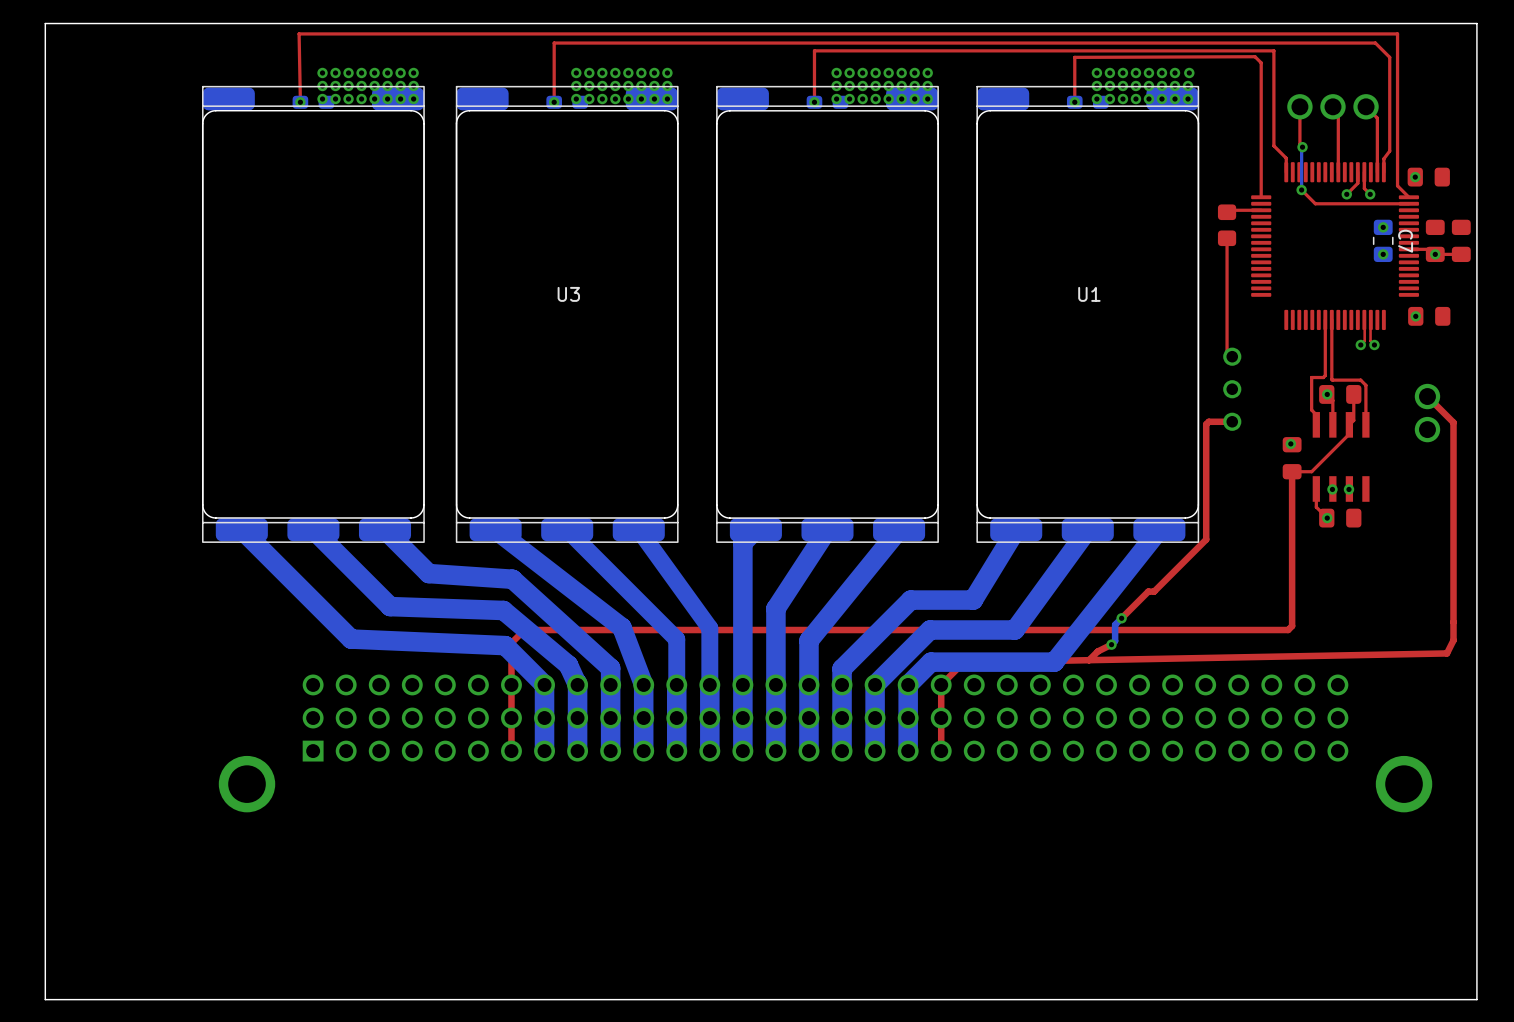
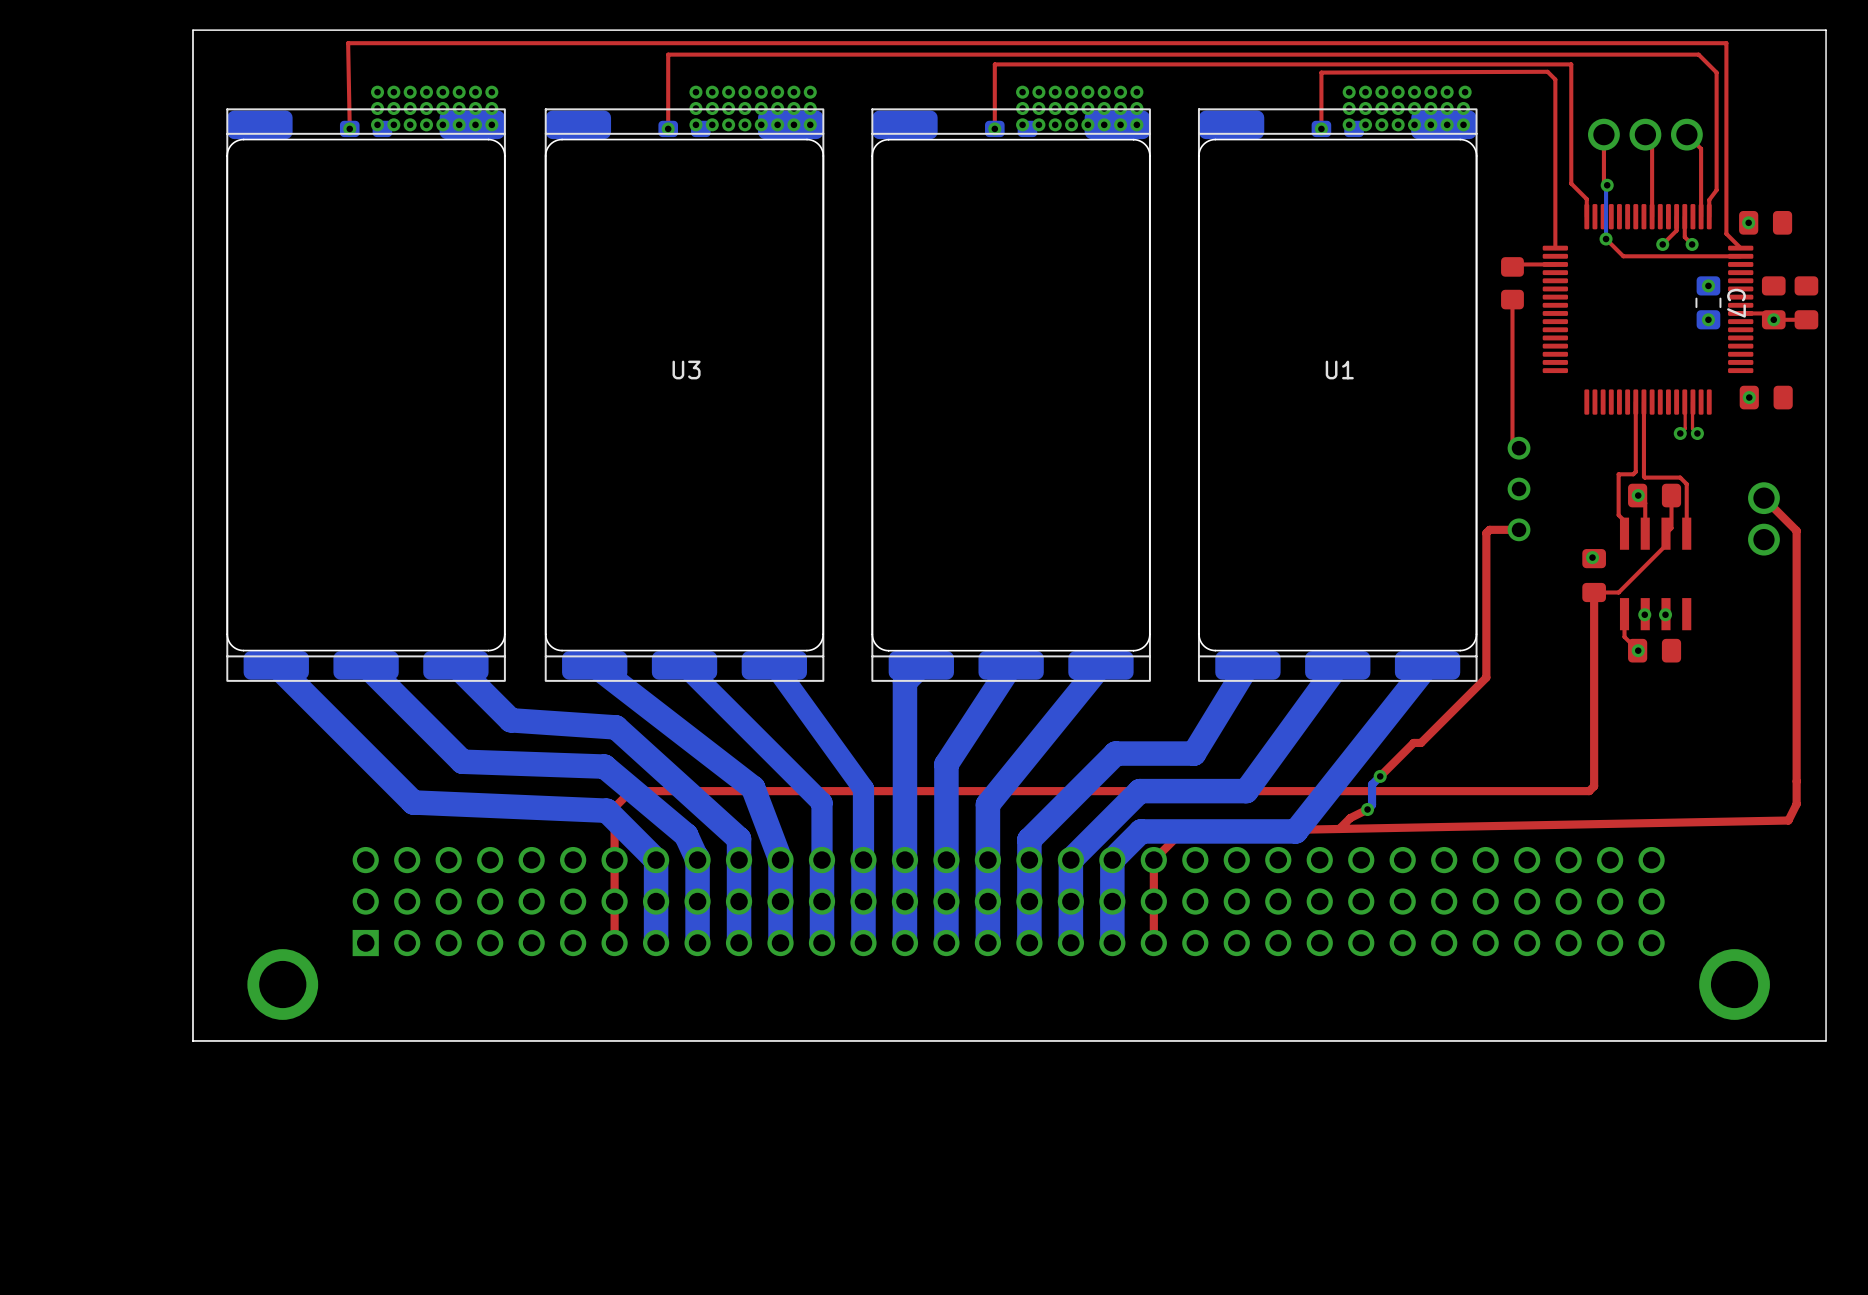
board edge: (175, 23) (45, 23) (45, 999) (1476, 999) (1476, 829) -> (192, 30) (192, 1040) (1826, 1040)

